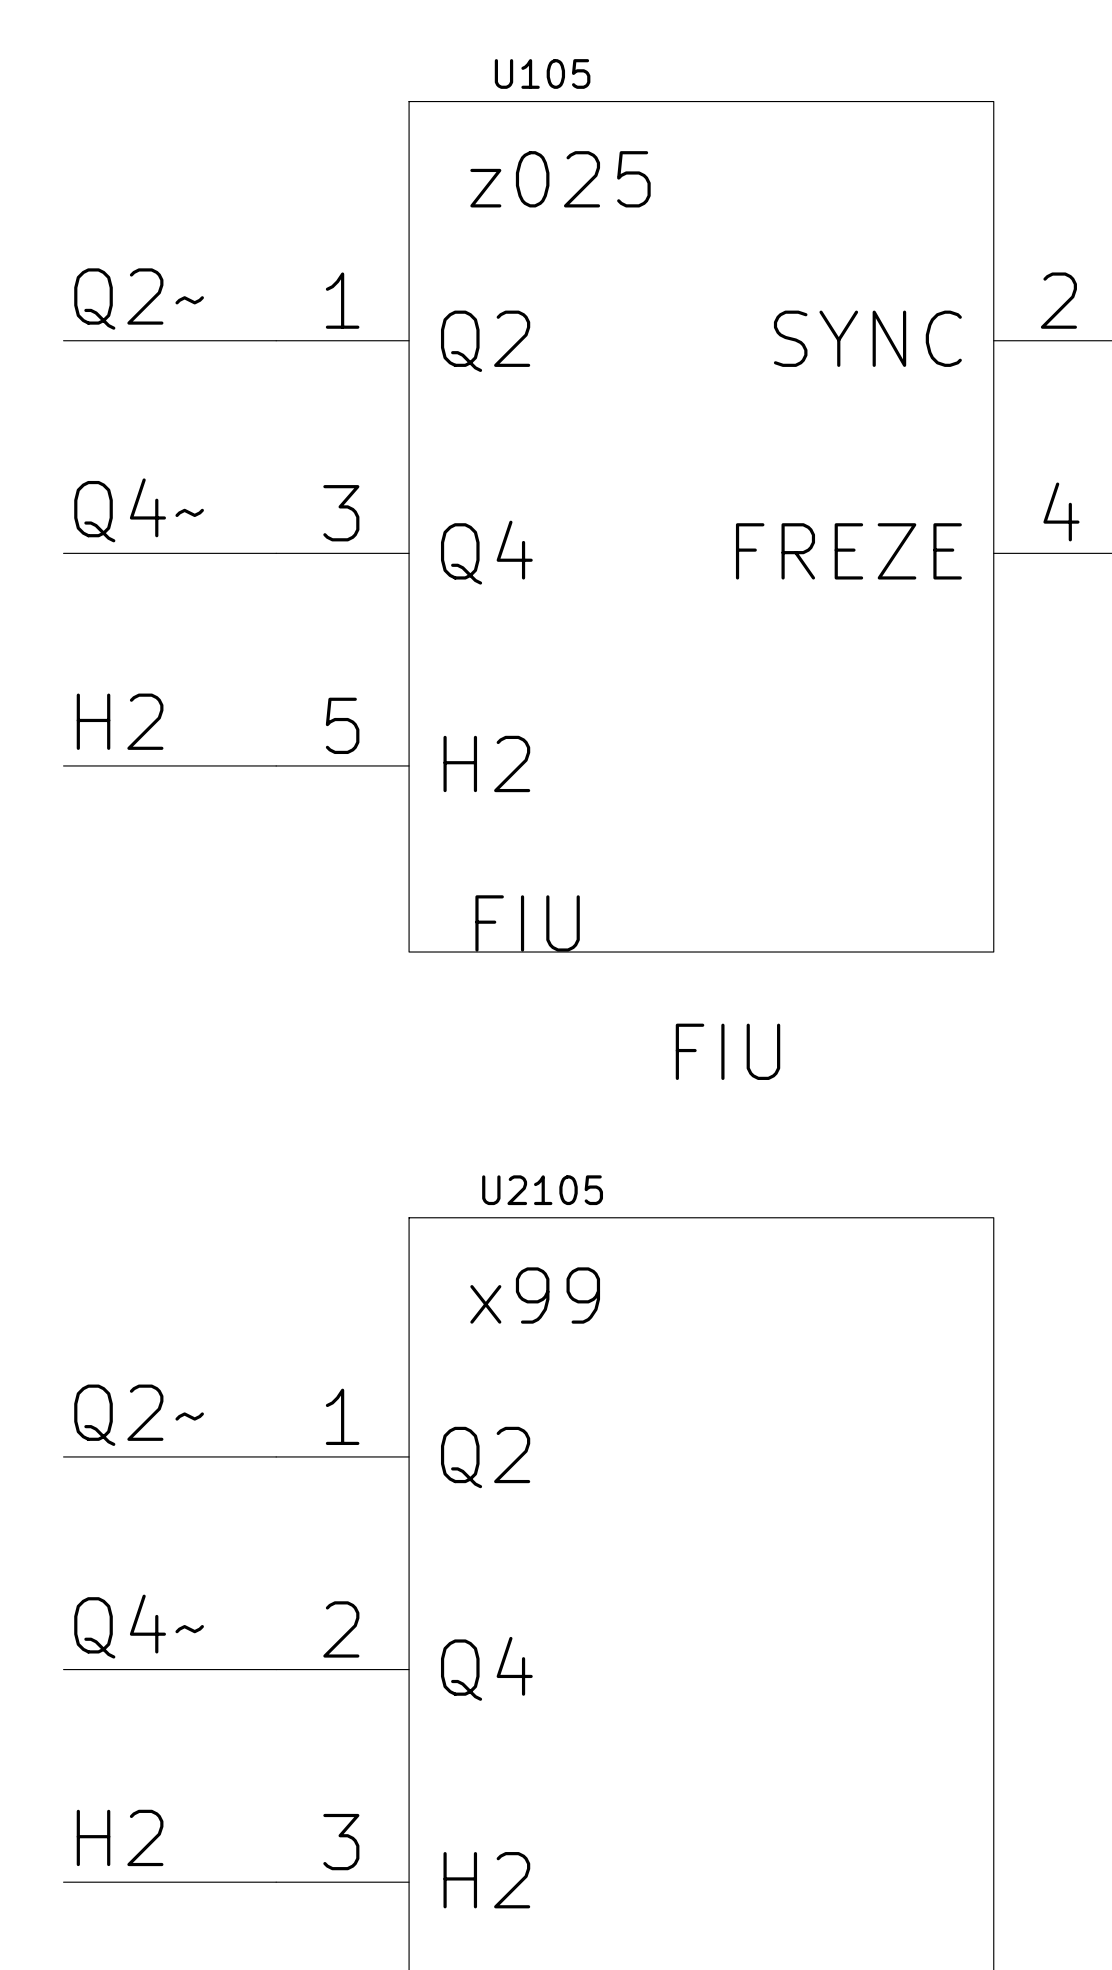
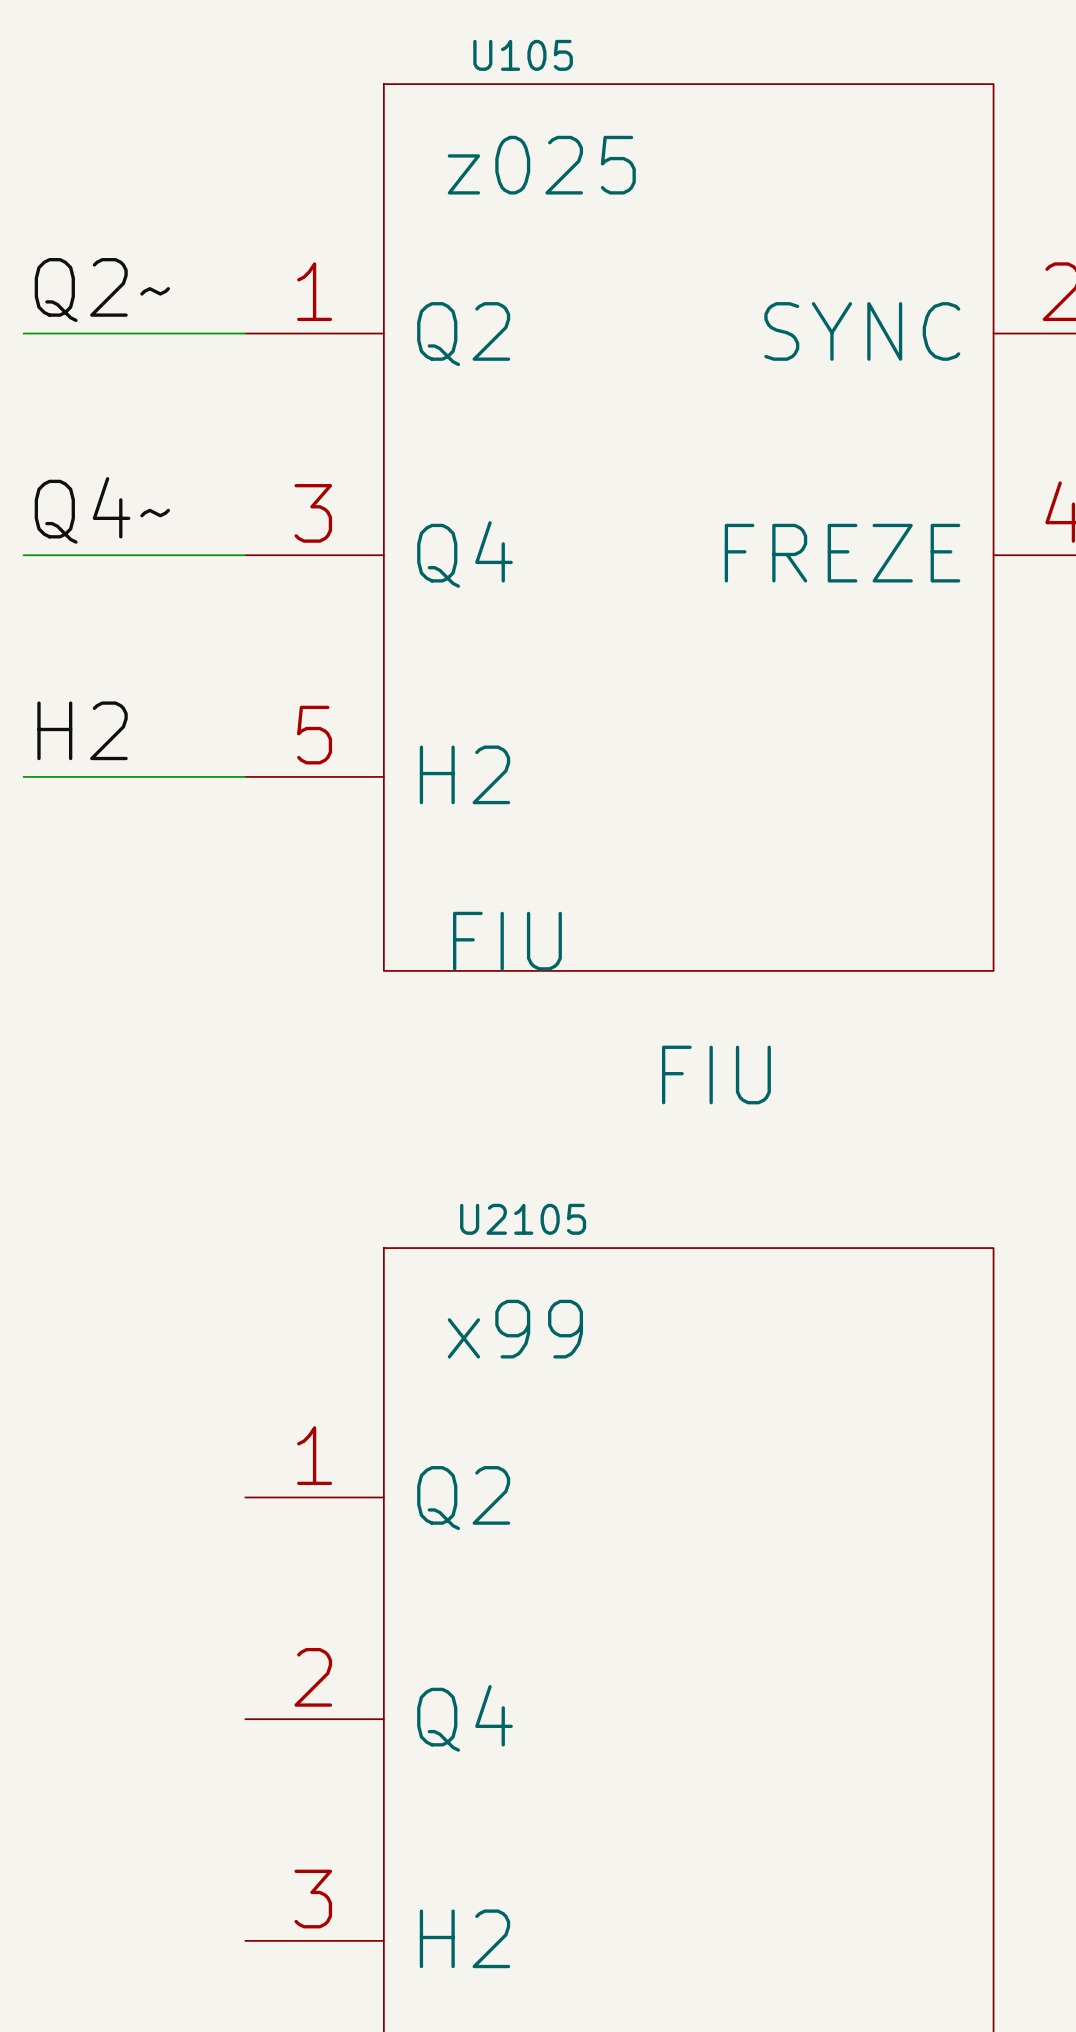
label: Q2~ (139, 1415) -> none
wire: (63, 1456) (276, 1456) -> none
label: Q4~ (139, 1626) -> none
wire: (63, 1669) (276, 1669) -> none
label: H2 (120, 1837) -> none
wire: (63, 1882) (276, 1882) -> none

